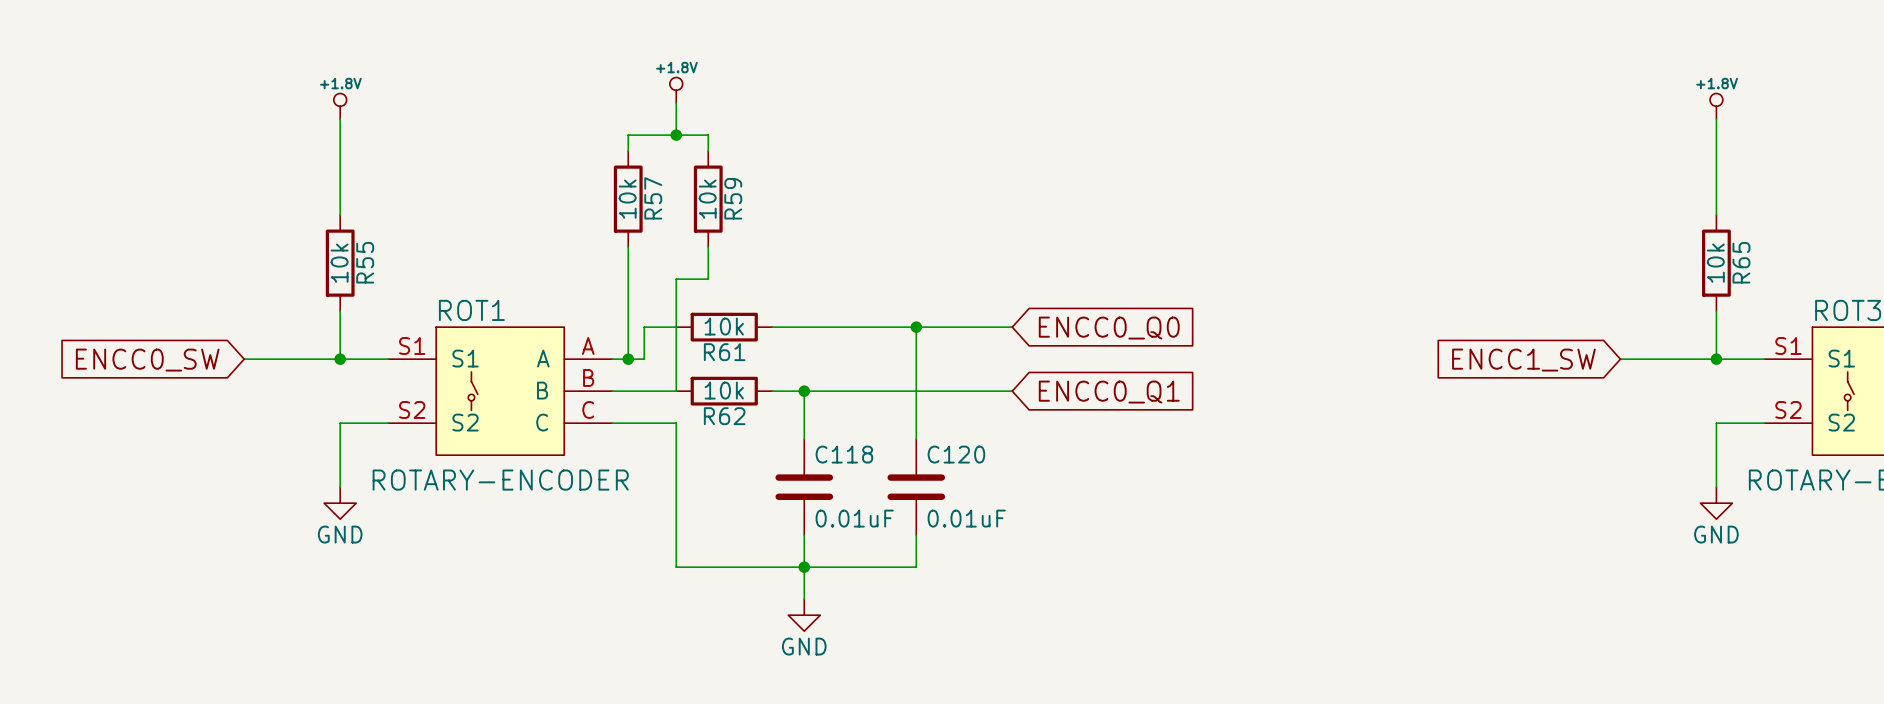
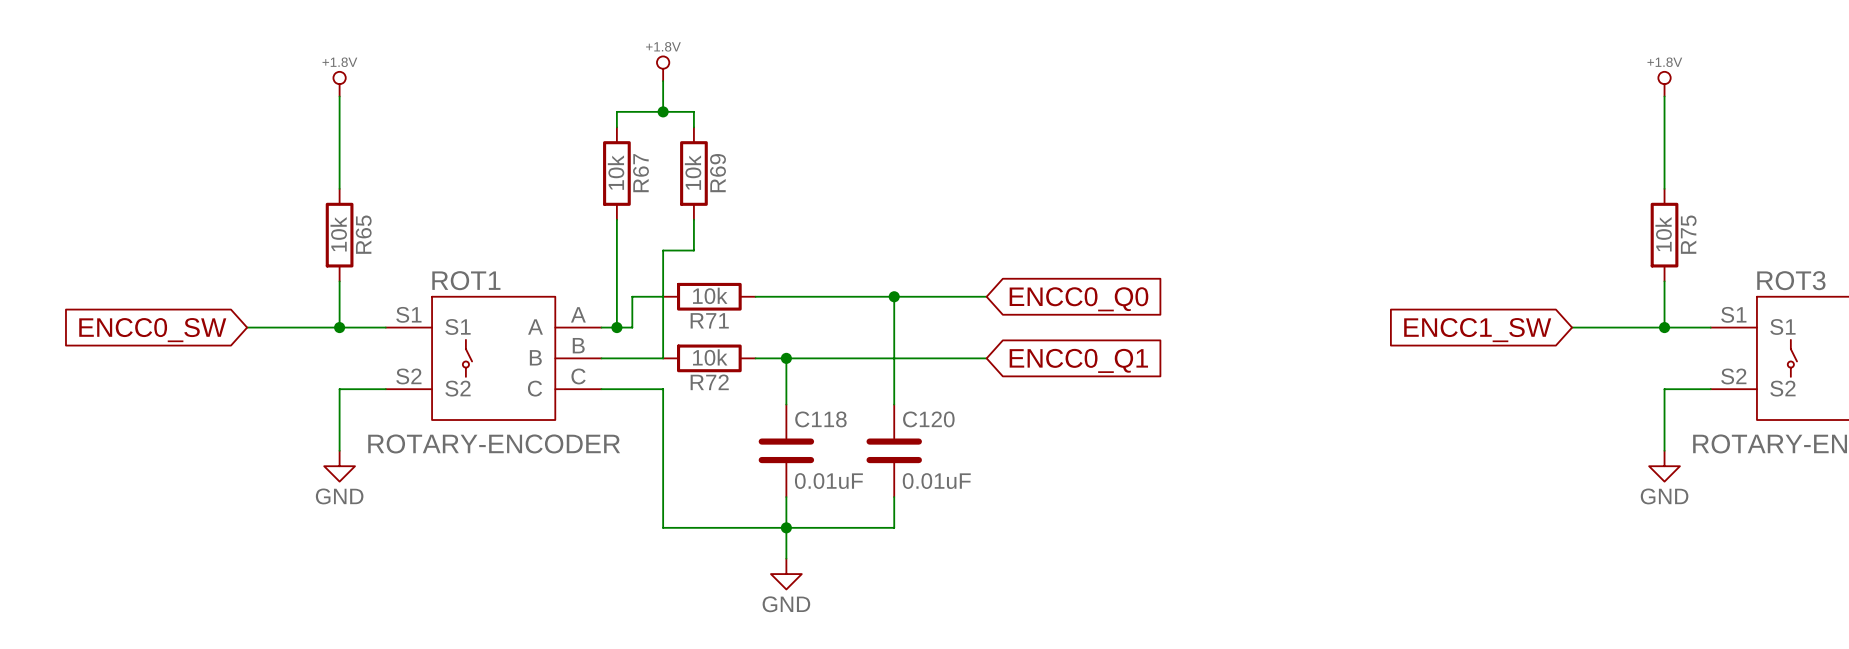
R57 name: R57 (653, 198) -> R67 (640, 173)
R59 name: R59 (733, 198) -> R69 (718, 173)
R55 name: R55 (365, 262) -> R65 (363, 234)
R65 name: R65 (1741, 262) -> R75 (1688, 234)
R61 name: R61 (724, 352) -> R71 (709, 320)
R62 name: R62 (724, 416) -> R72 (709, 382)

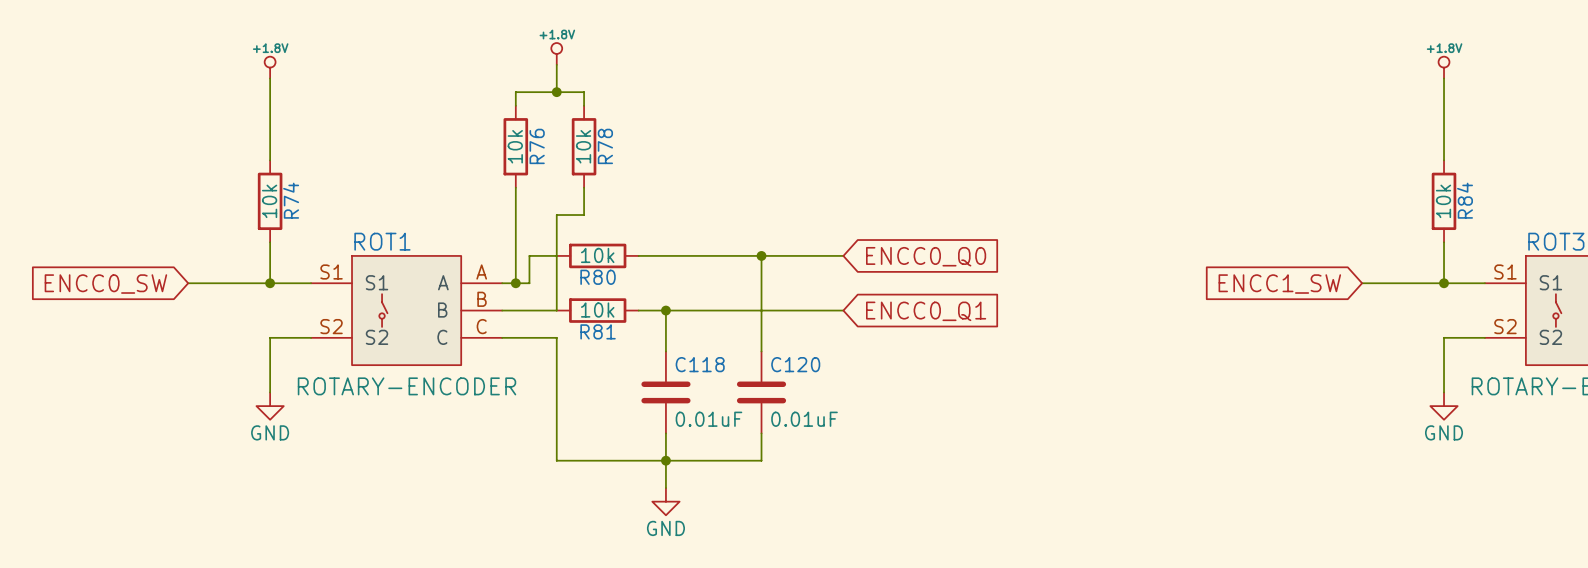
R67 name: R67 (640, 173) -> R76 (537, 146)
R69 name: R69 (718, 173) -> R78 (605, 146)
R65 name: R65 (363, 234) -> R74 (291, 200)
R75 name: R75 (1688, 234) -> R84 (1465, 200)
R71 name: R71 (709, 320) -> R80 (598, 277)
R72 name: R72 (709, 382) -> R81 (598, 331)

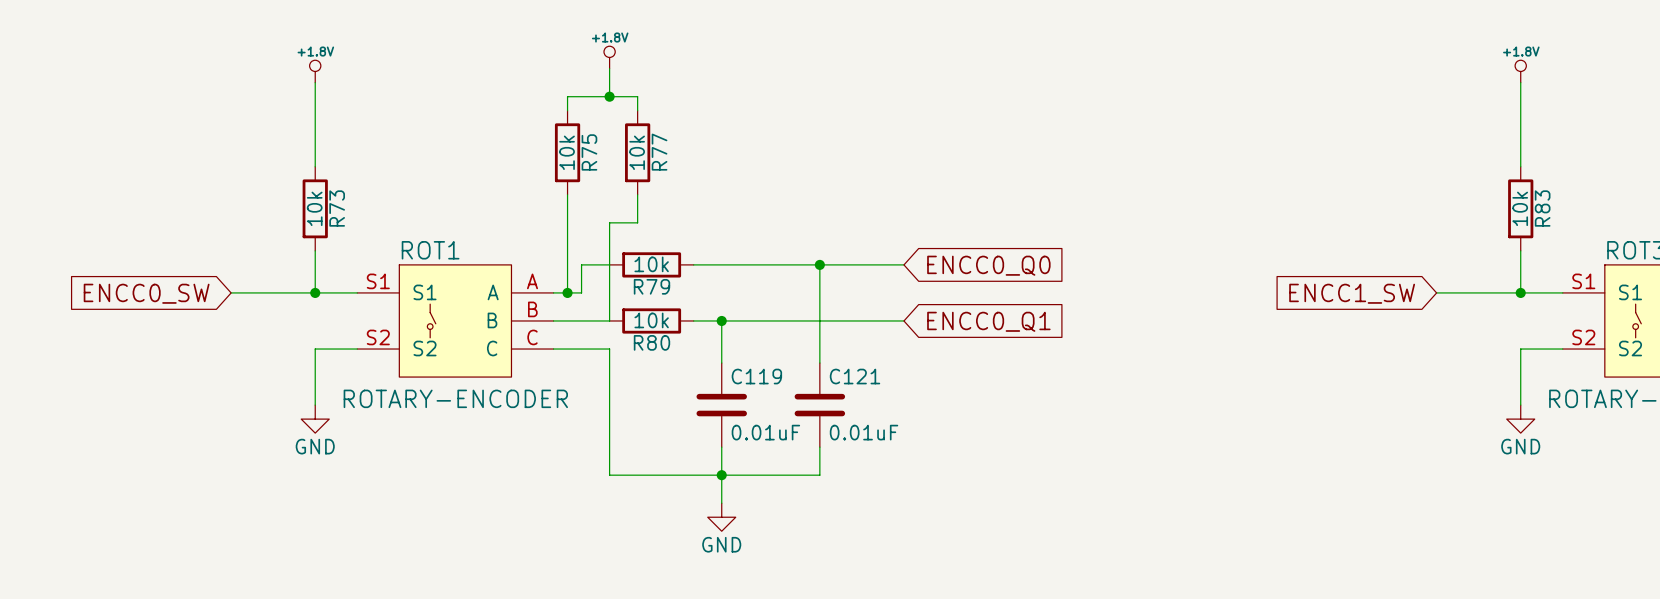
R76 name: R76 (537, 146) -> R75 (589, 152)
R78 name: R78 (605, 146) -> R77 (659, 152)
R74 name: R74 (291, 200) -> R73 (337, 208)
R84 name: R84 (1465, 200) -> R83 (1542, 208)
R80 name: R80 (598, 277) -> R79 (651, 286)
R81 name: R81 (598, 331) -> R80 (651, 342)
C118 name: C118 (700, 364) -> C119 (756, 376)
C120 name: C120 (795, 364) -> C121 (855, 376)

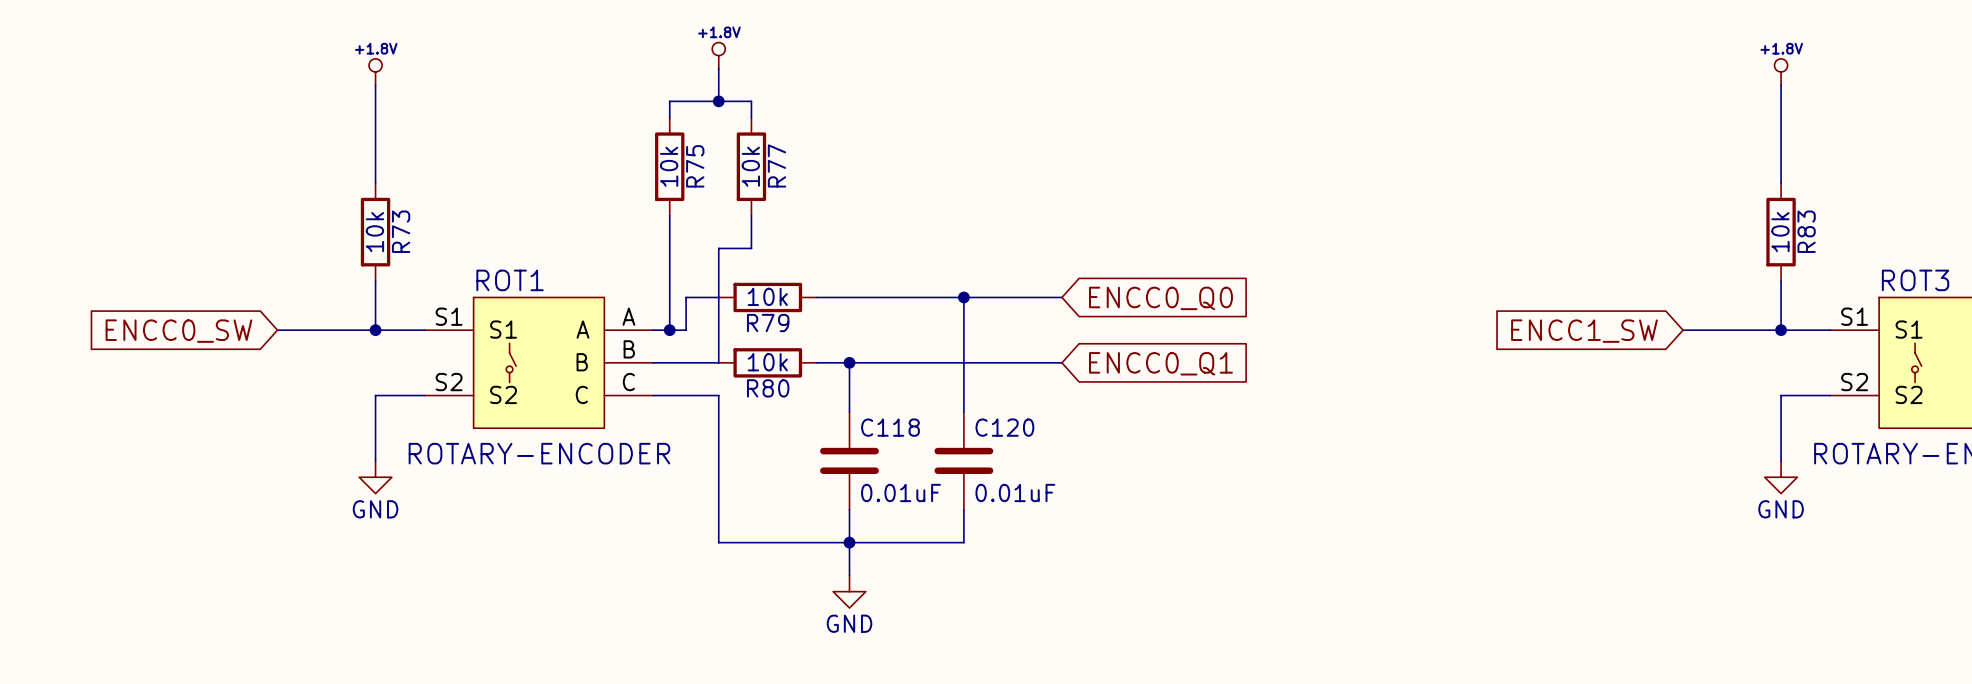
C119 name: C119 (756, 376) -> C118 (890, 427)
C121 name: C121 (855, 376) -> C120 (1004, 427)

